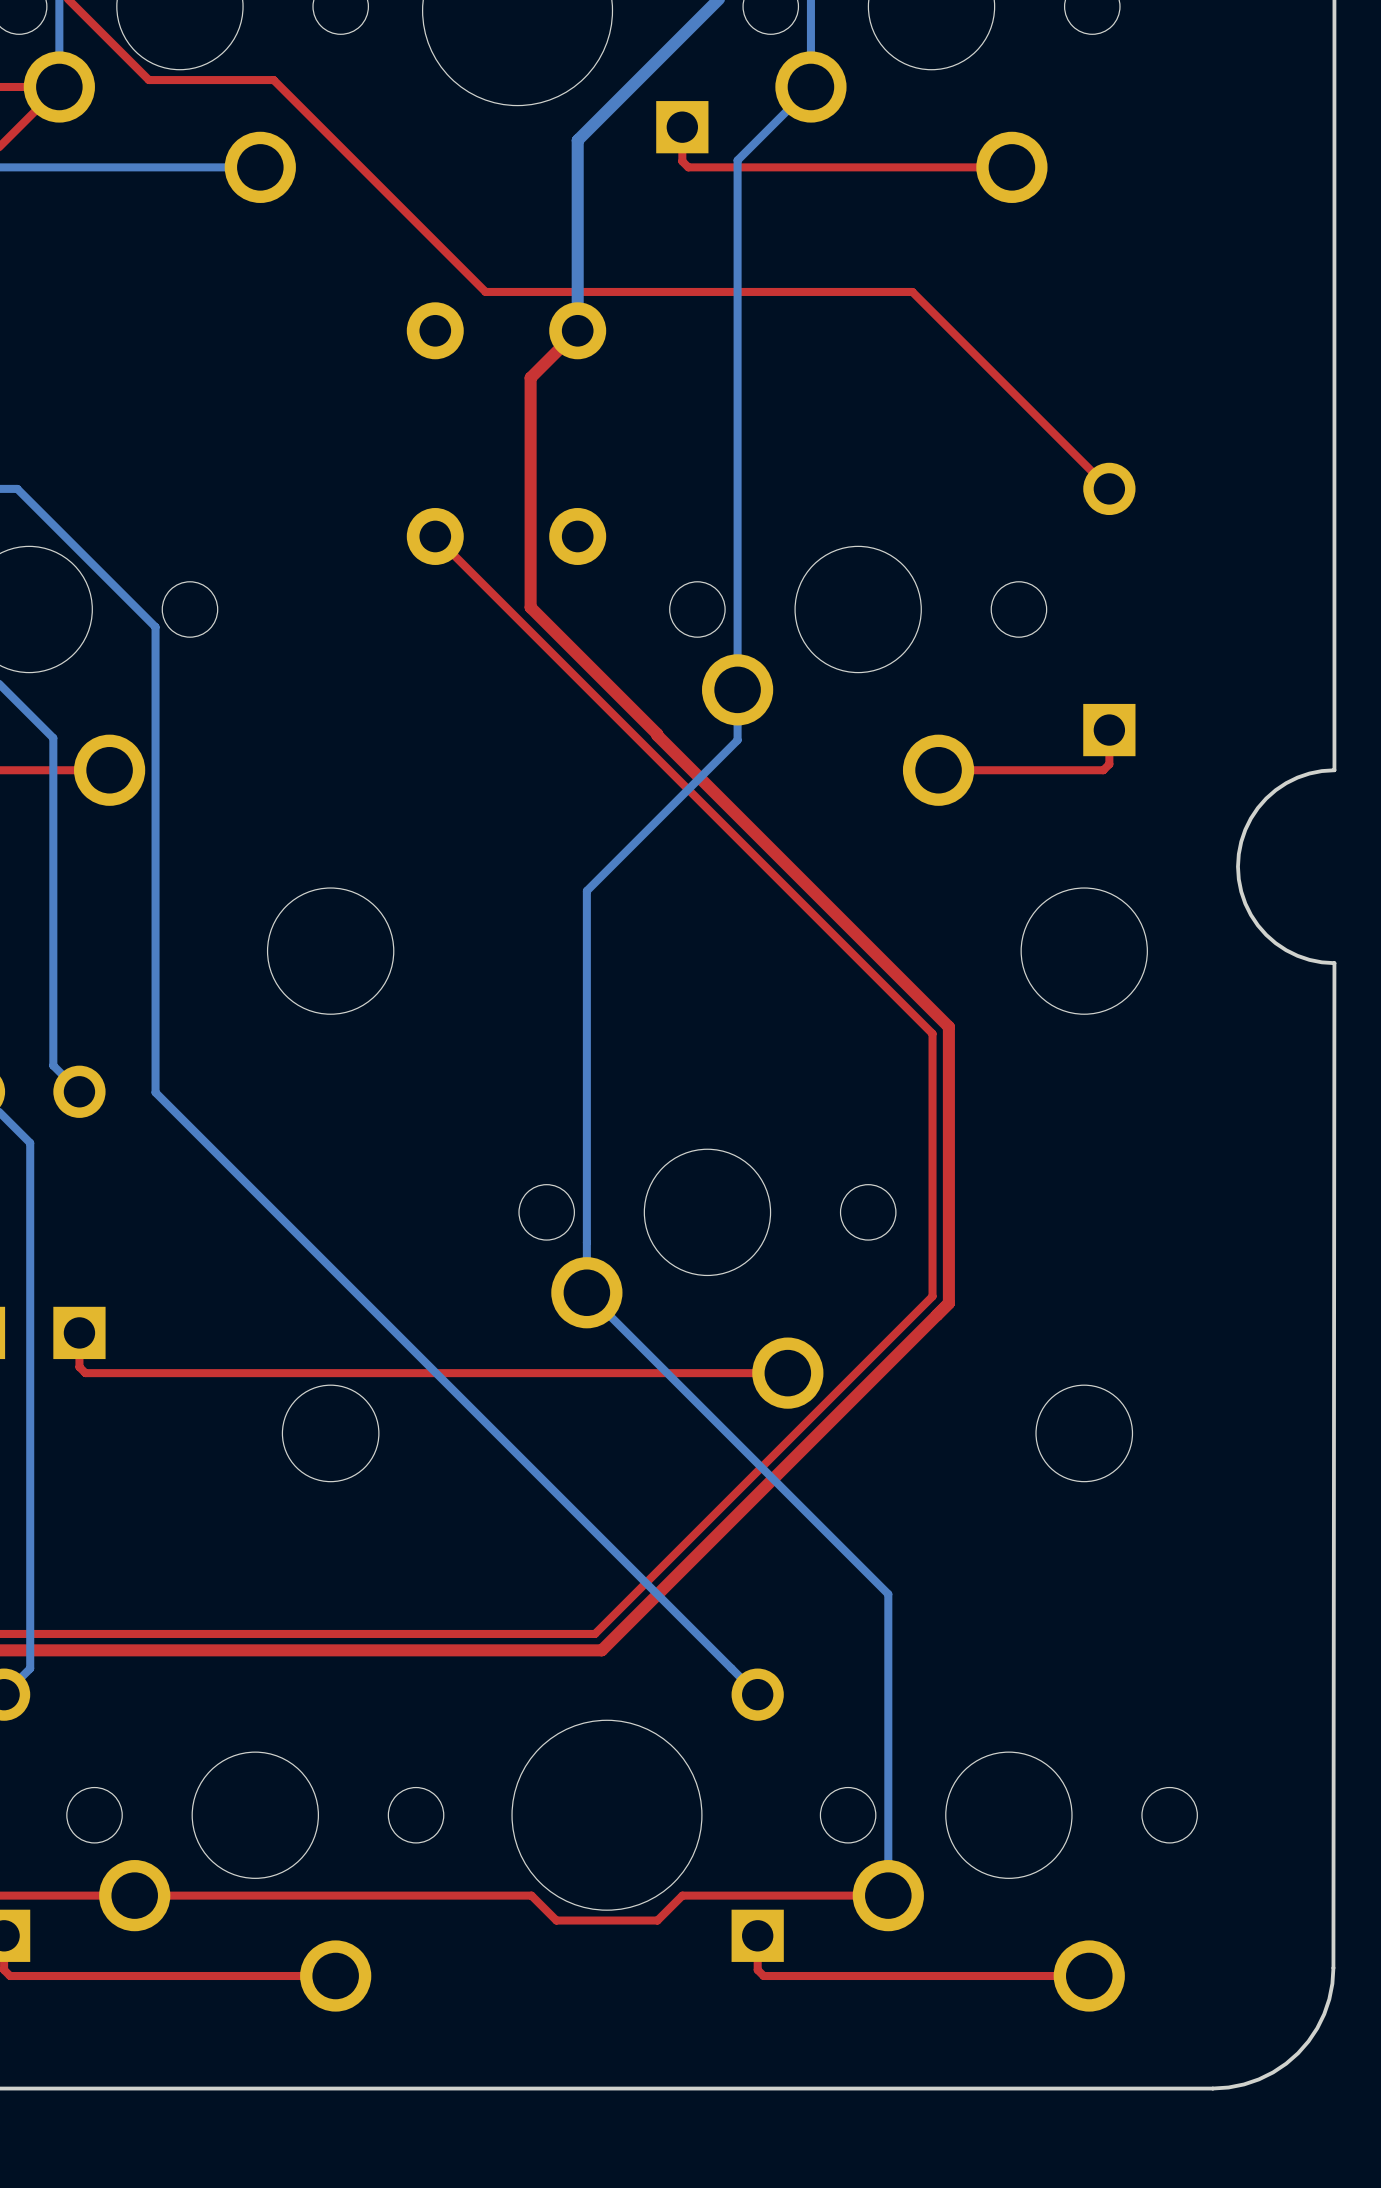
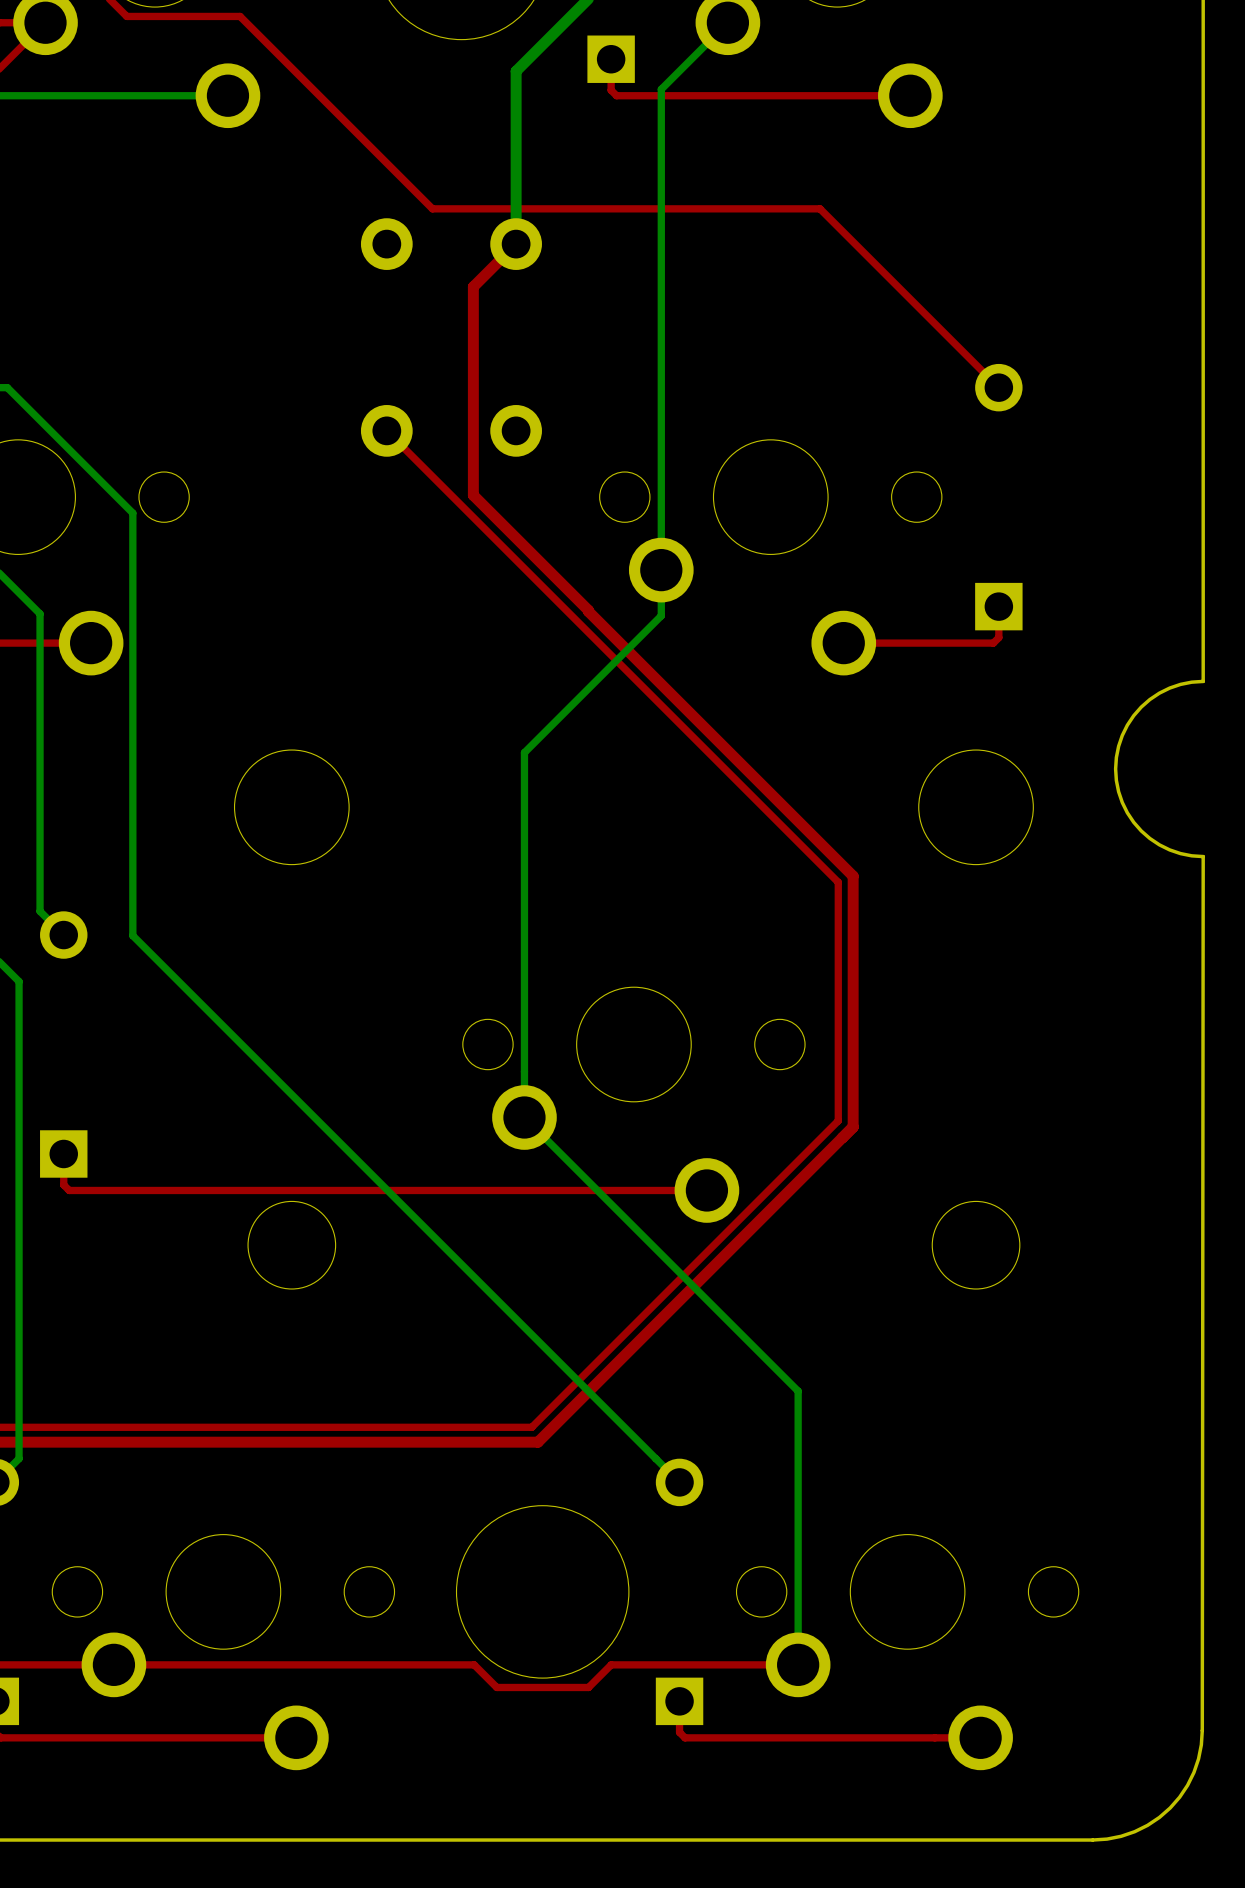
board edge: (1334, 770) (1309, 773) (1297, 777) (1275, 790) (1266, 798) (1250, 818) (1245, 829) (1241, 841) (1237, 866) (1241, 891) (1245, 903) (1250, 914) (1266, 934) (1275, 943) (1297, 955) (1309, 959) (1334, 963) (1333, 1967) -> (1203, 643) (1203, 681) (1169, 688) (1141, 707) (1122, 735) (1115, 769) (1122, 802) (1141, 830) (1169, 849) (1203, 856) (1202, 1730)

